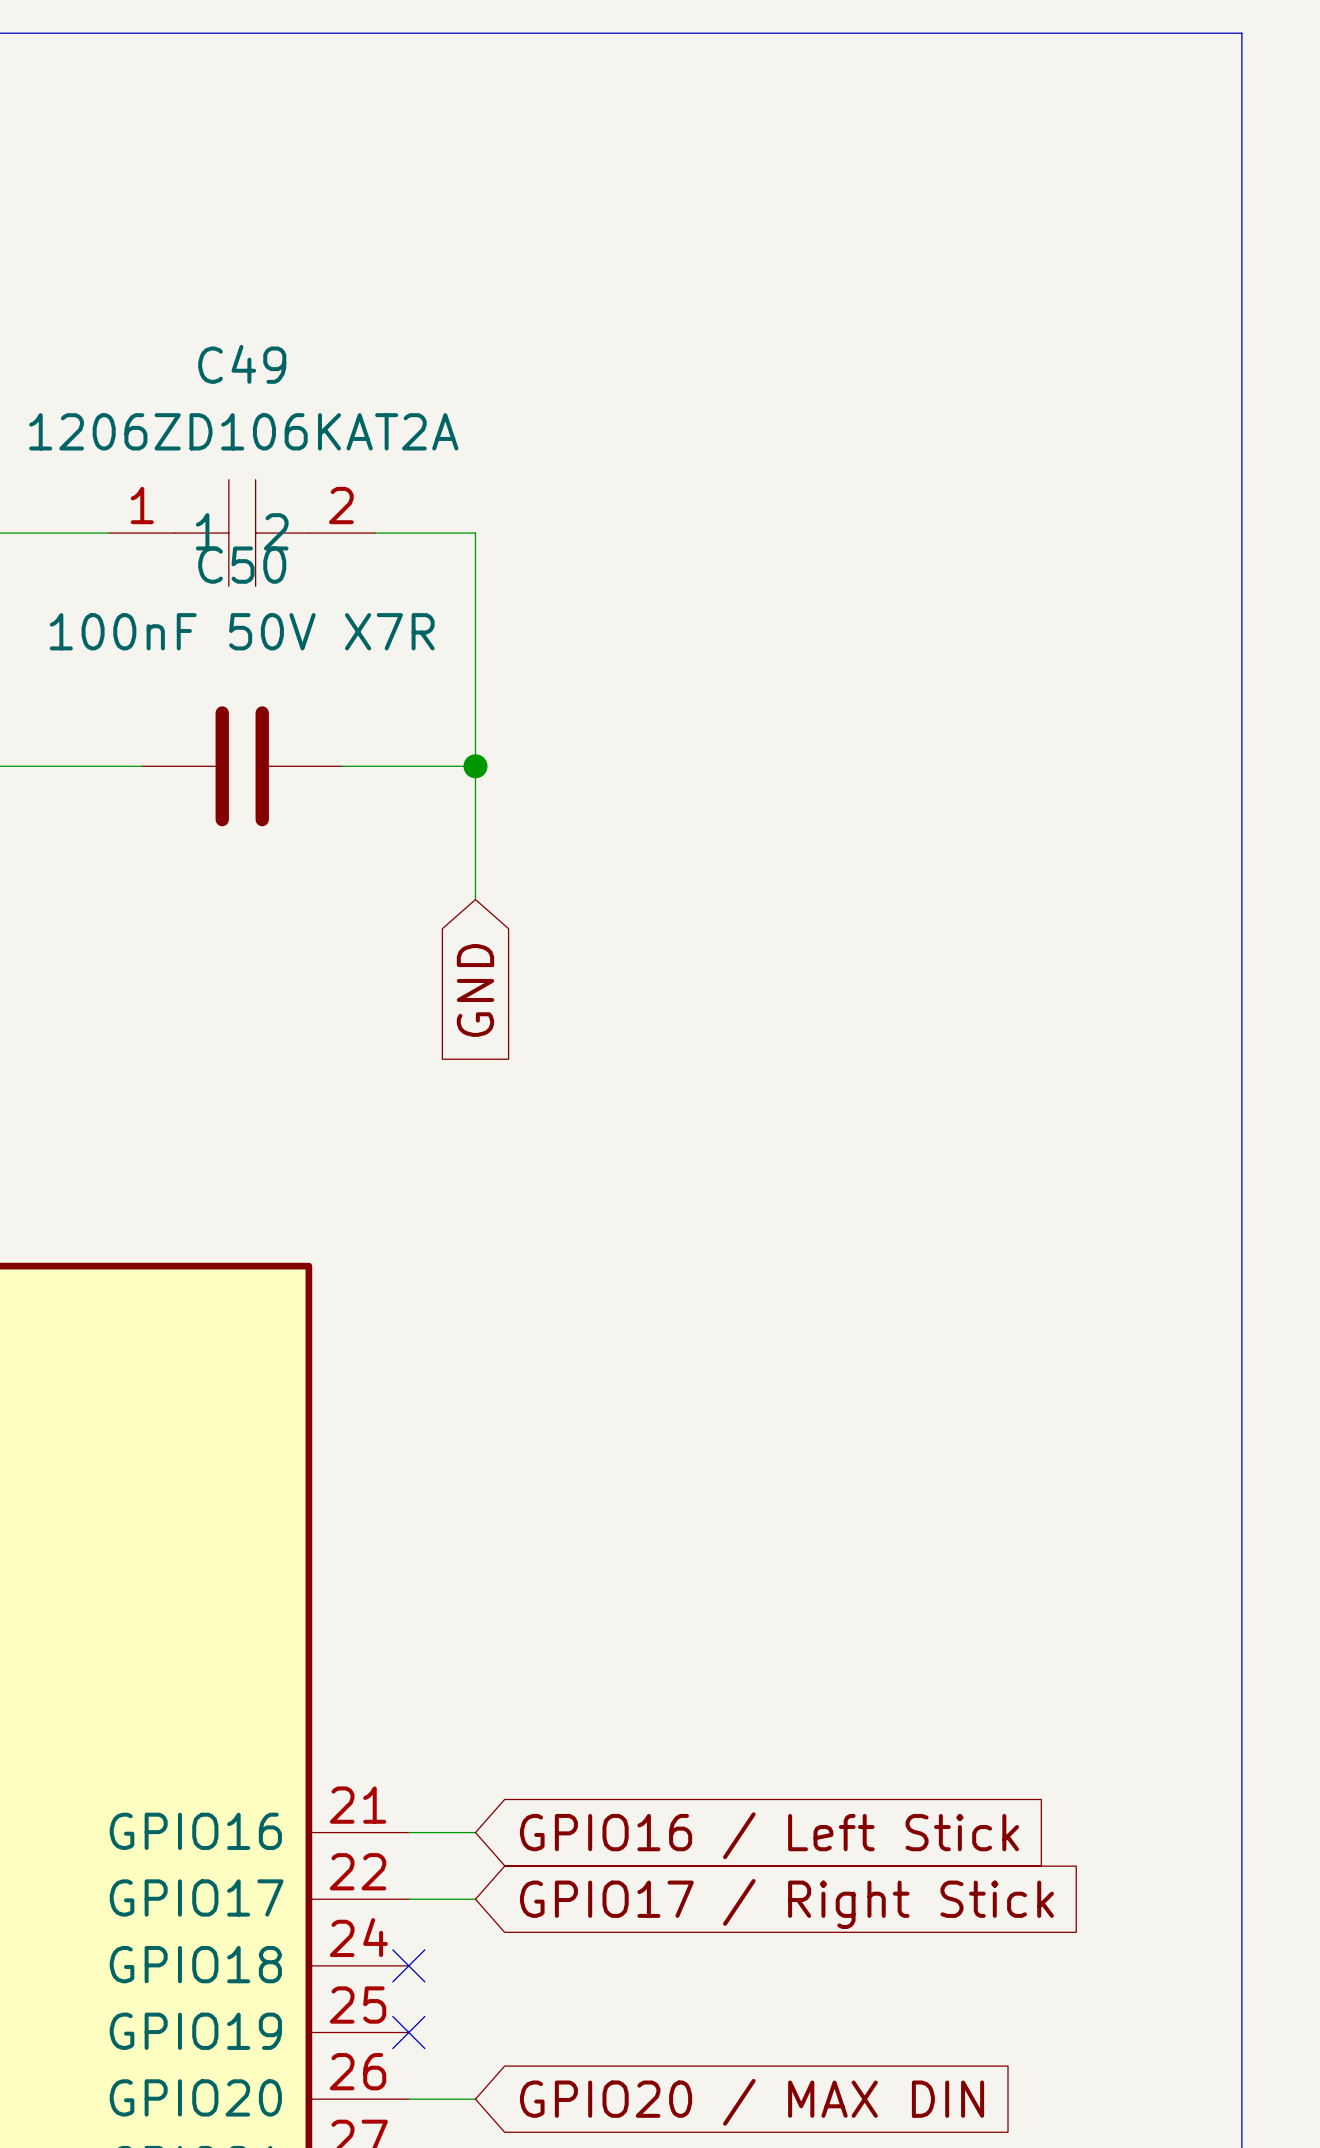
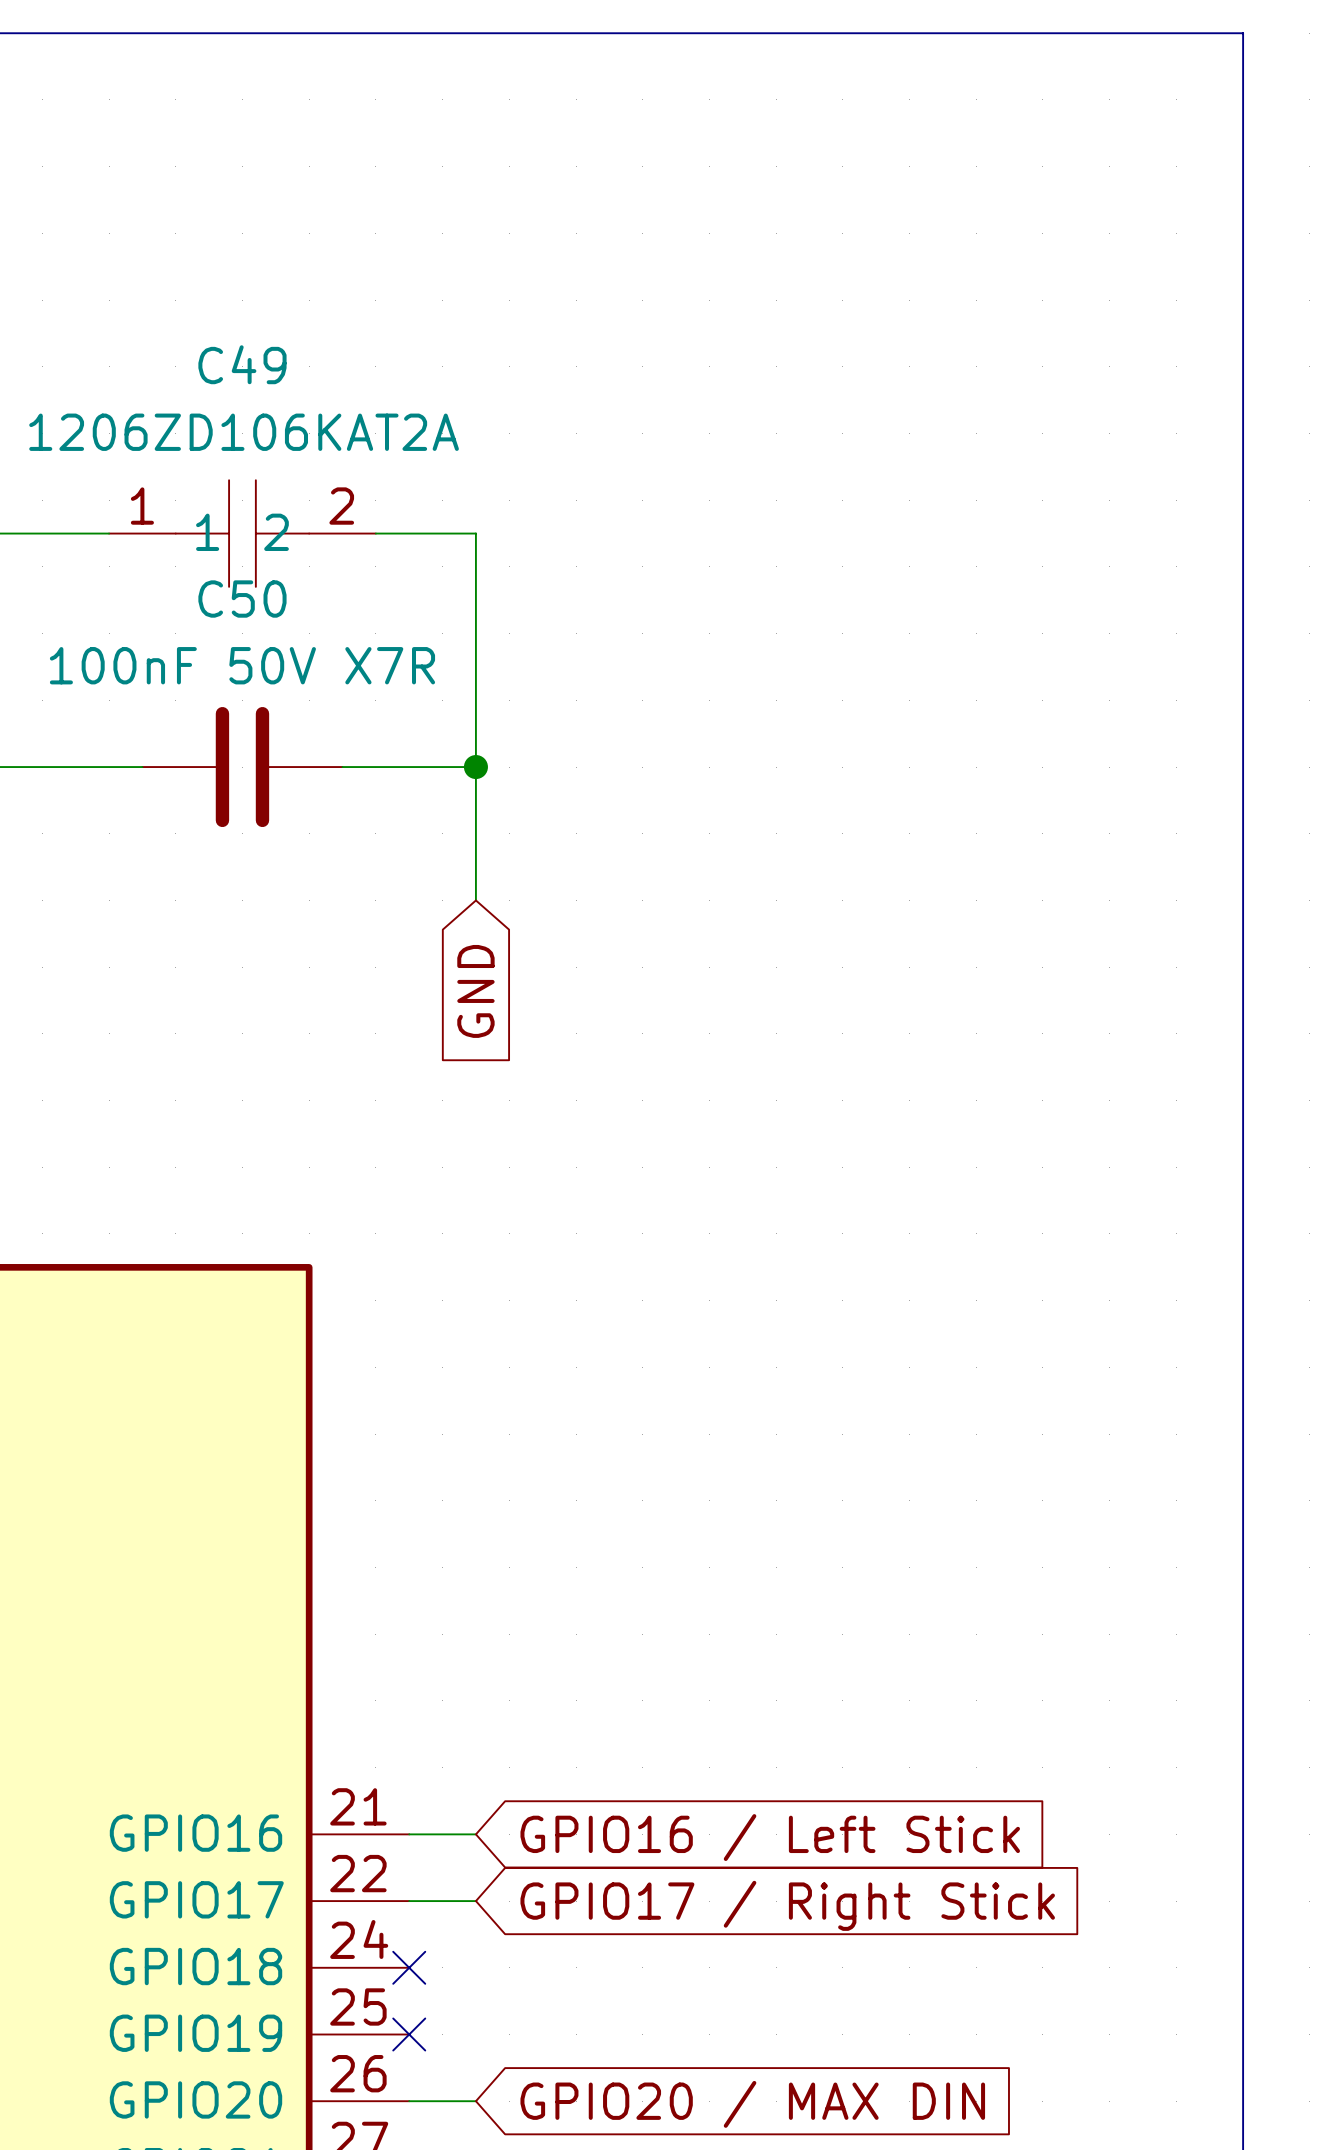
C50 name position: C50 (242, 565) -> C50 (242, 599)
C50 value position: 100nF 50V X7R (242, 631) -> 100nF 50V X7R (242, 665)

